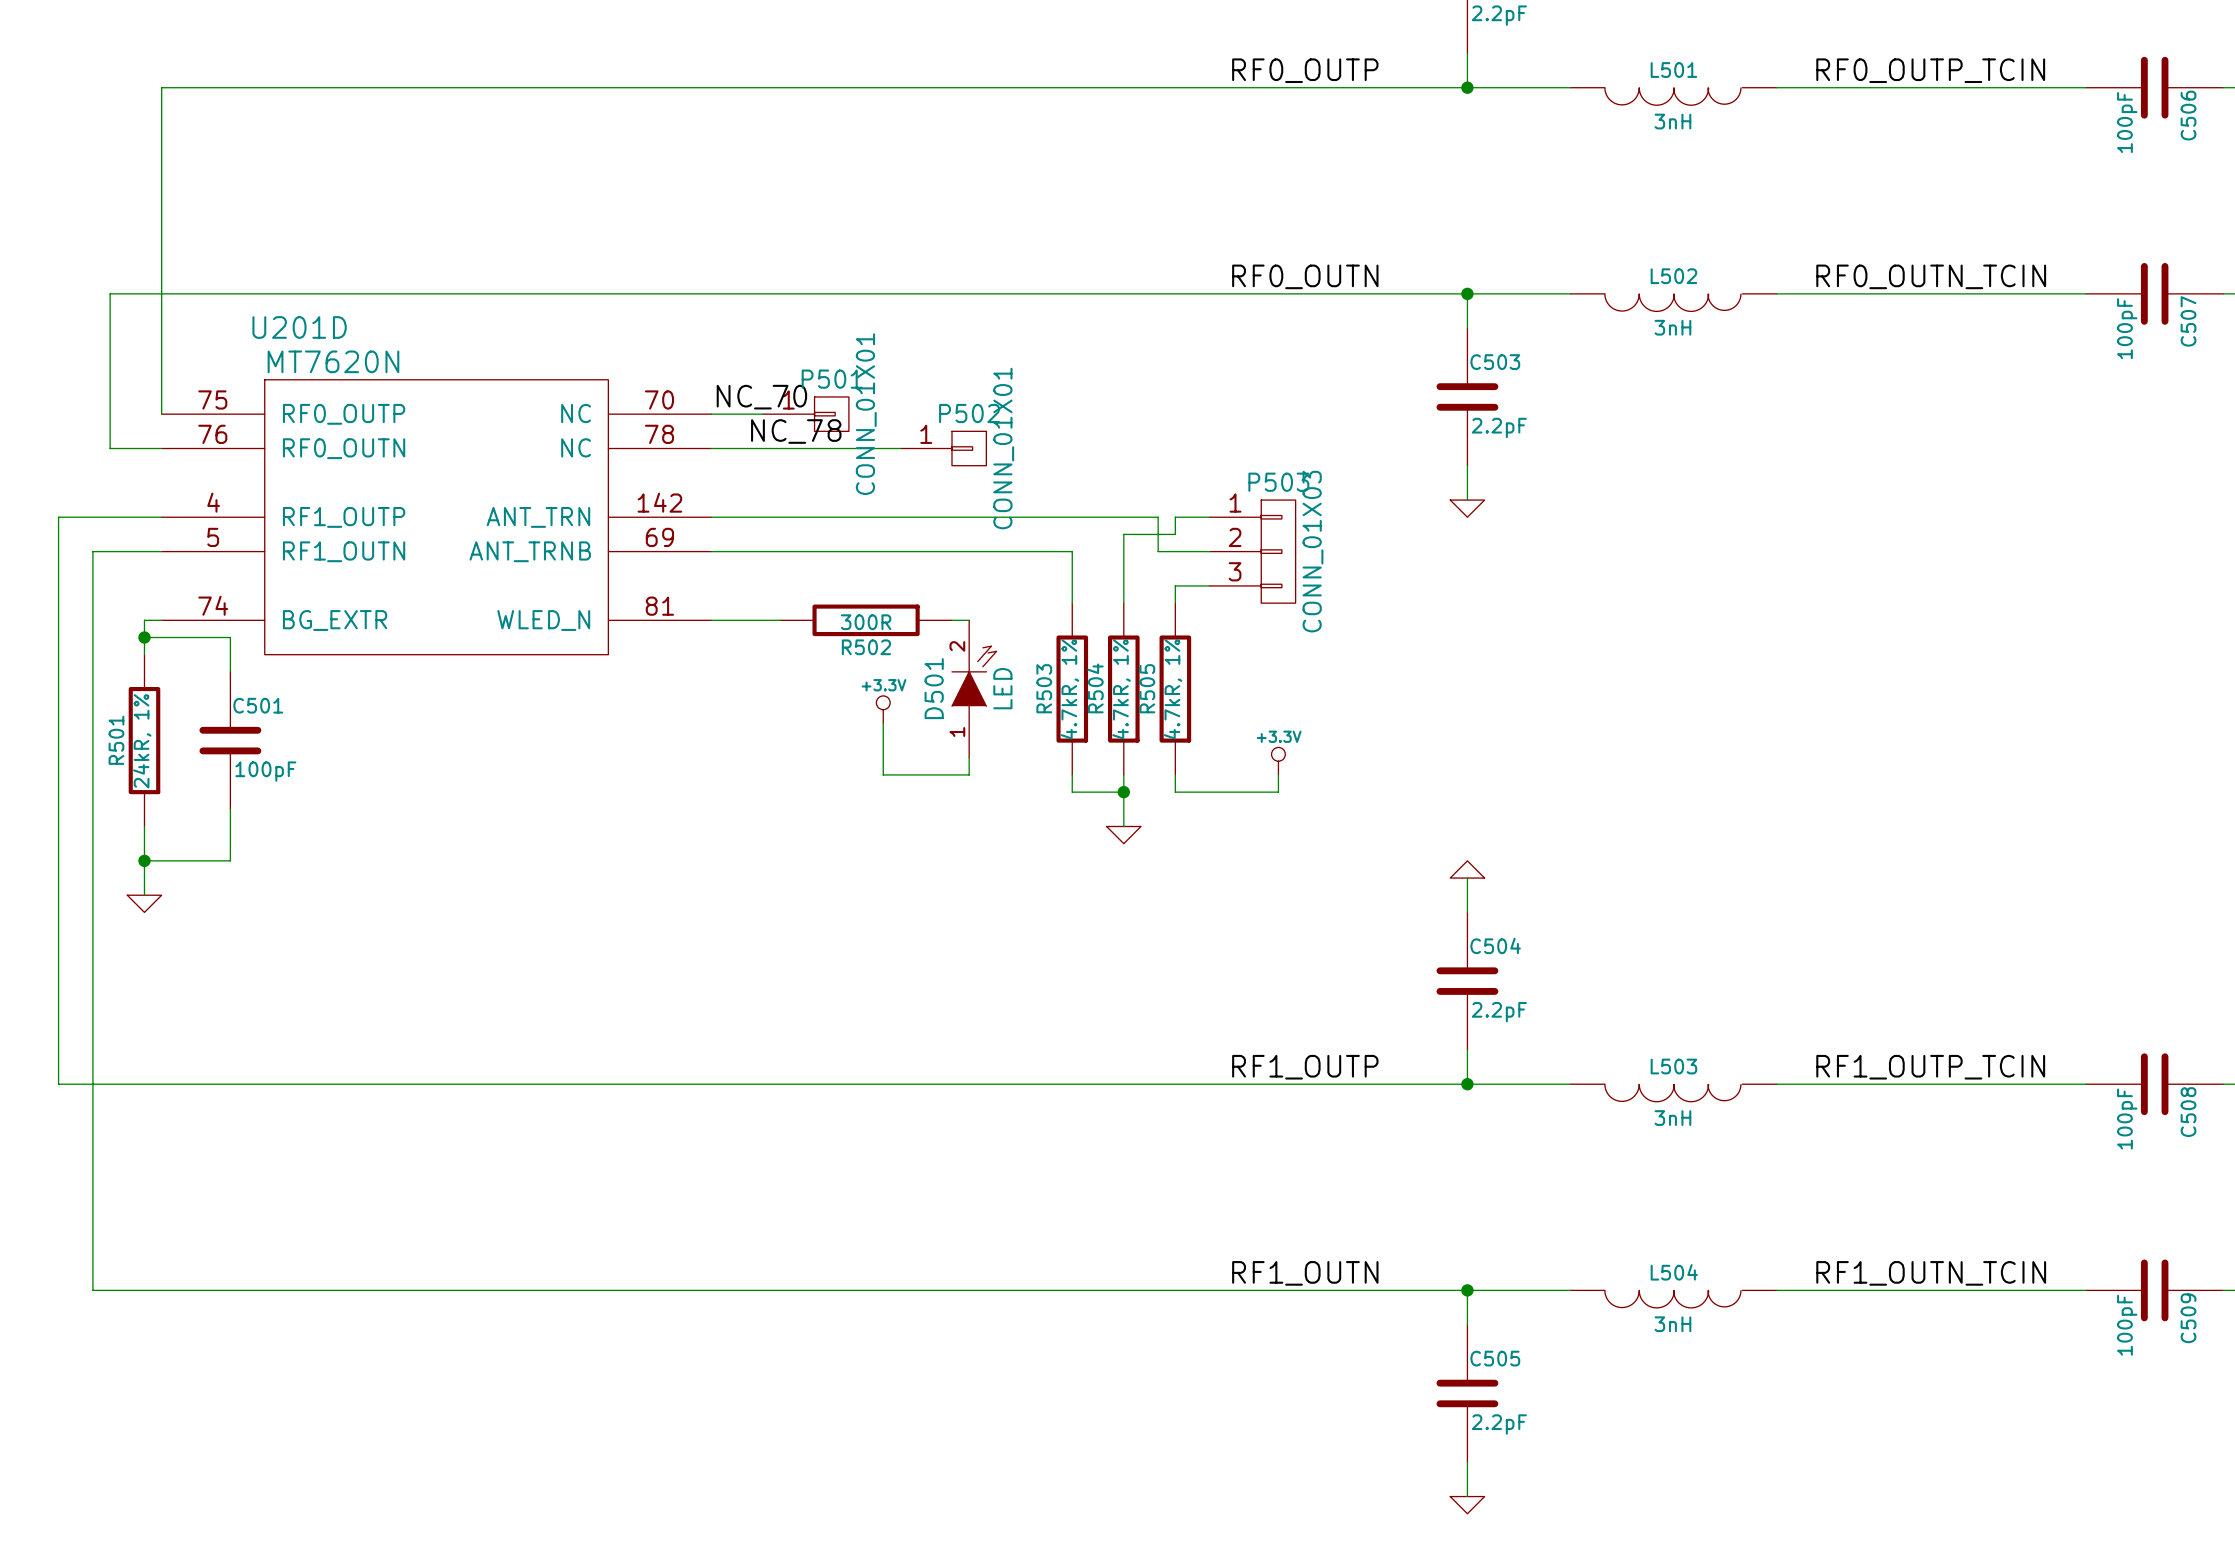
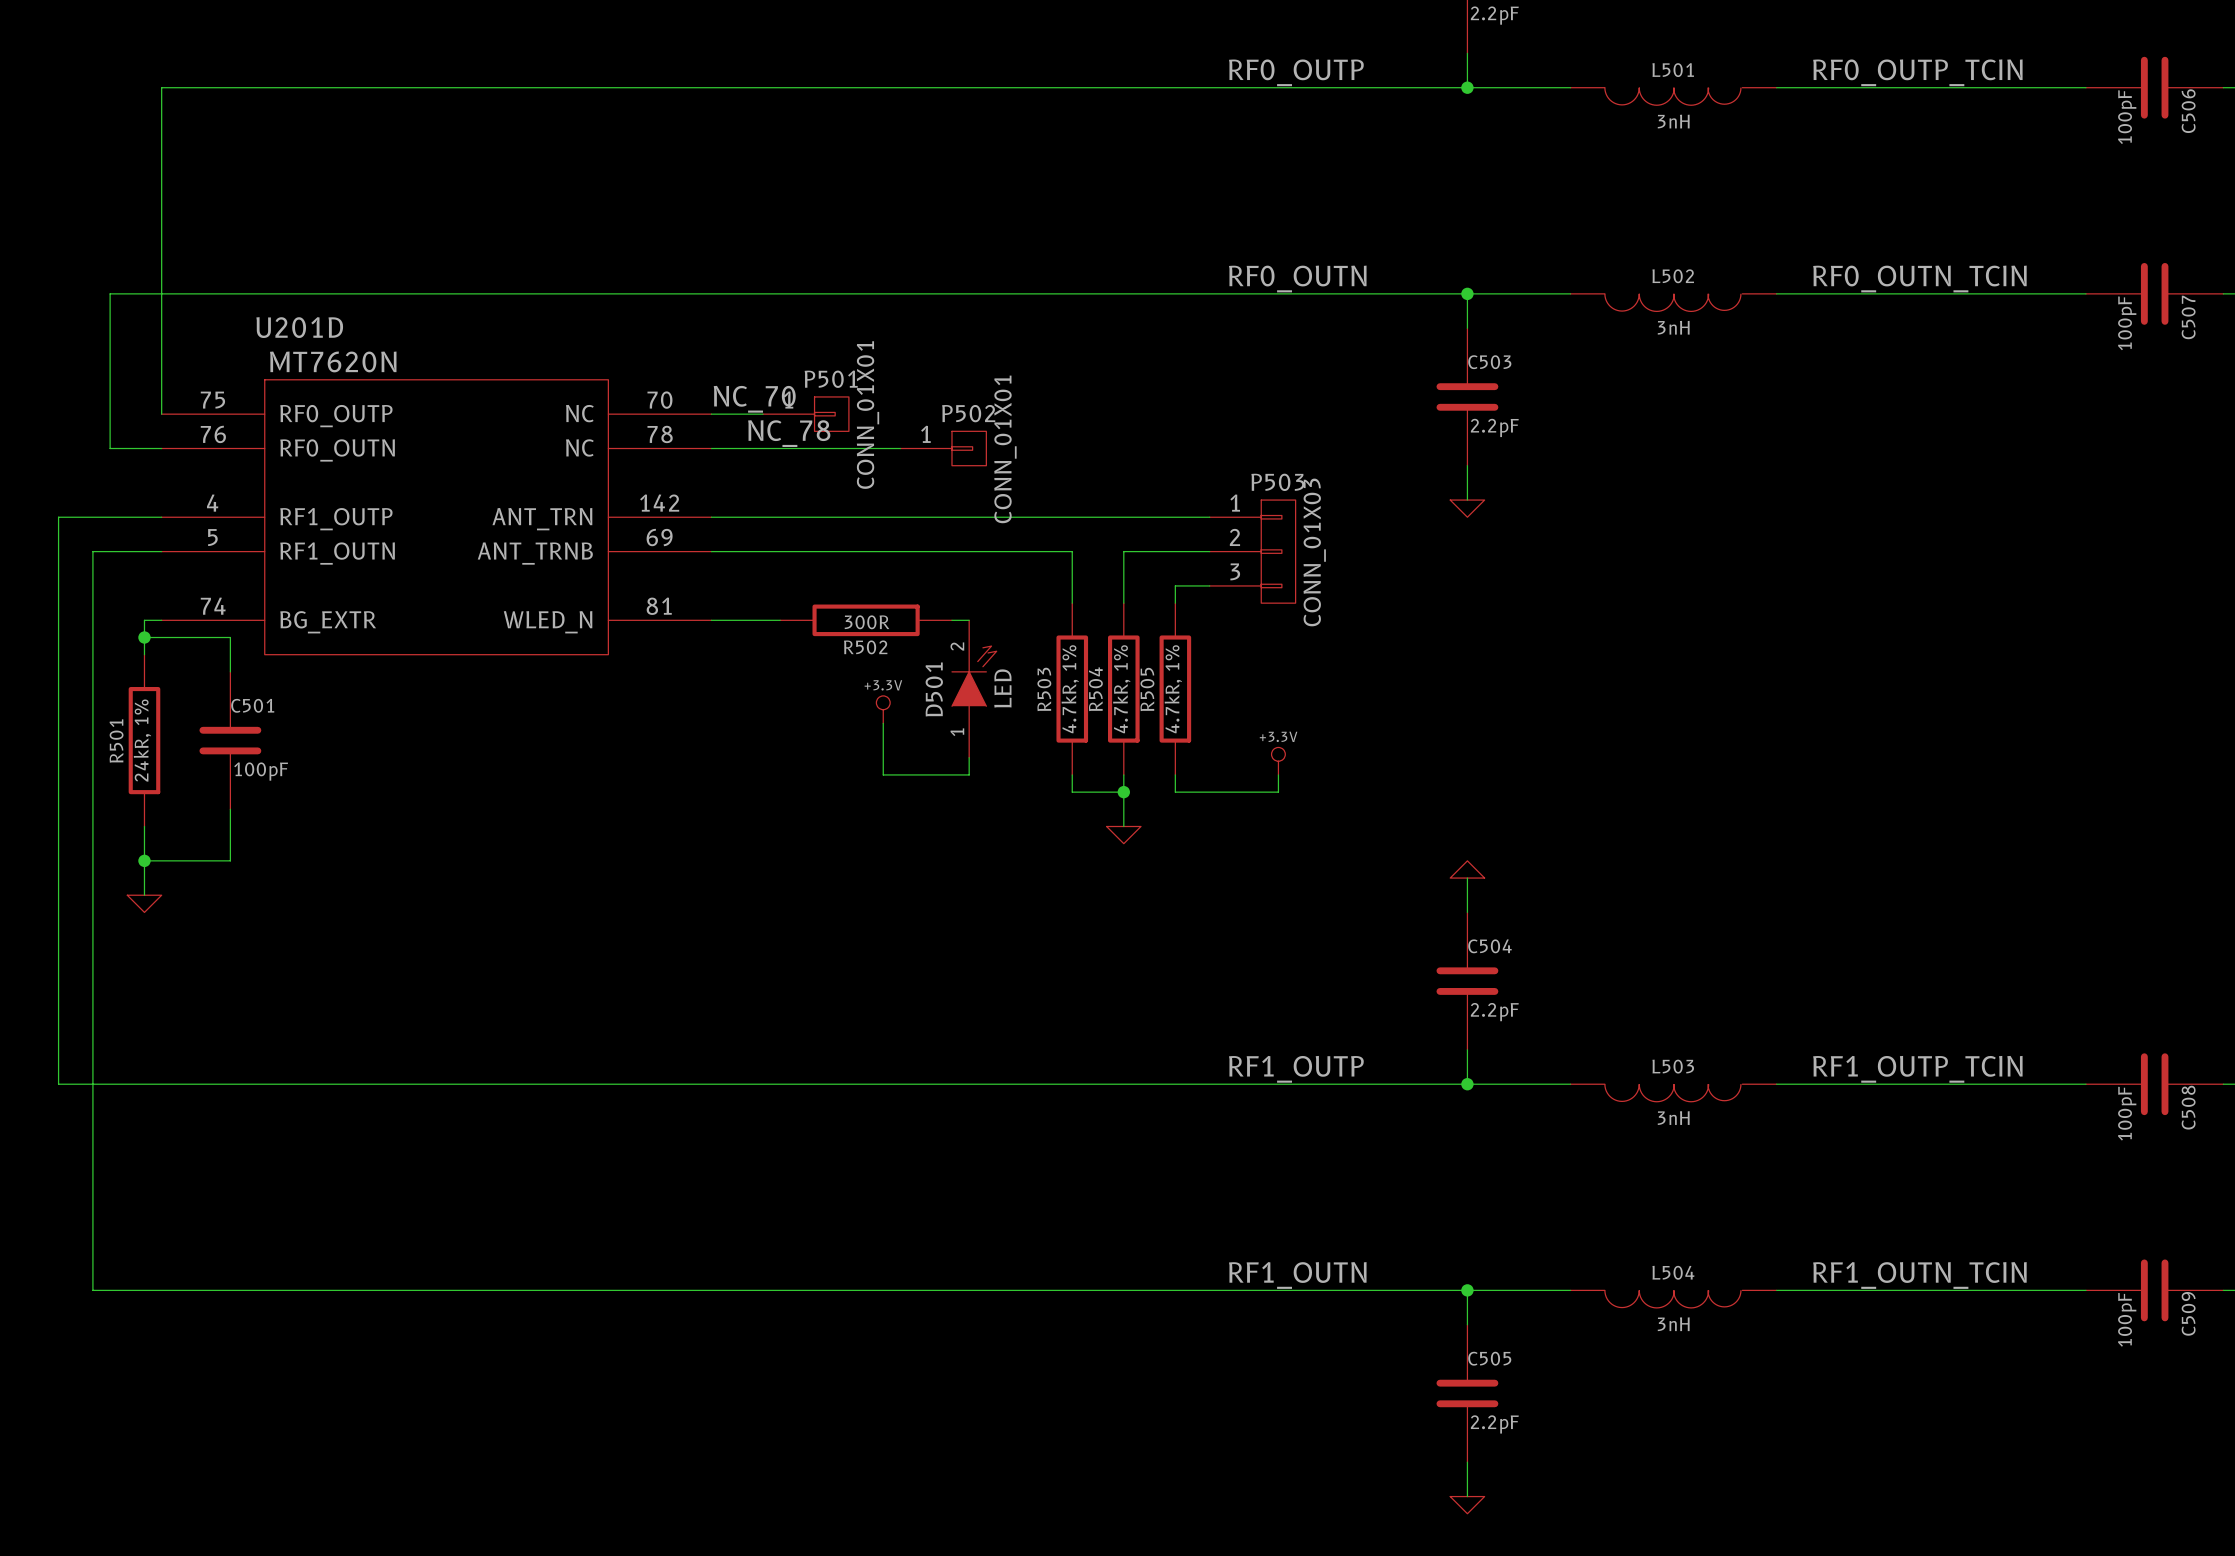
wire: (1158, 517) (1158, 551) -> (1158, 517) (1175, 517)
wire: (1175, 517) (1175, 534) (1123, 534) (1123, 551) -> (1158, 551) (1123, 551)

